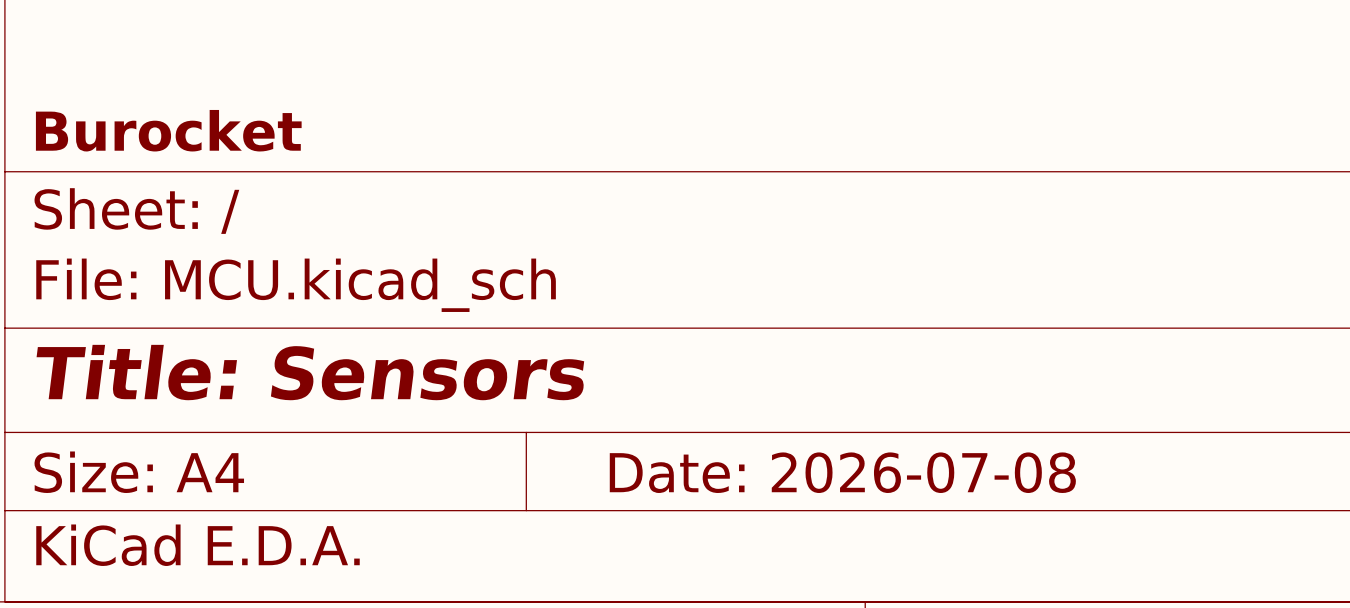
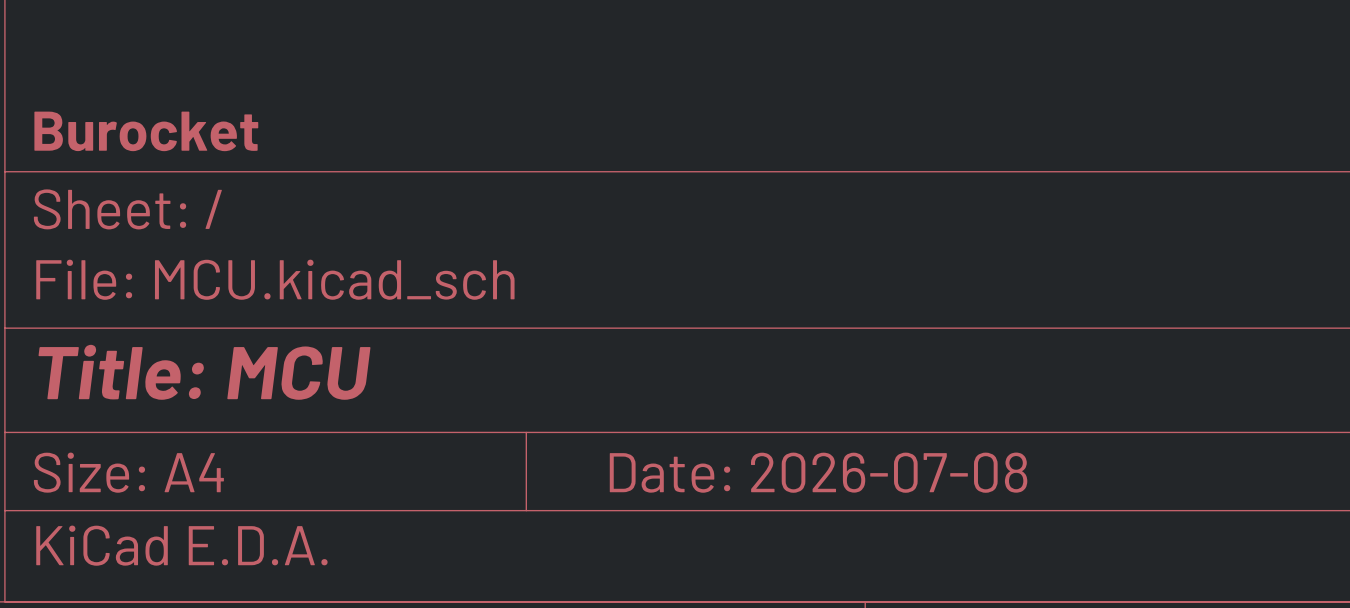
title block: Title: Sensors (310, 372) -> Title: MCU (204, 372)

